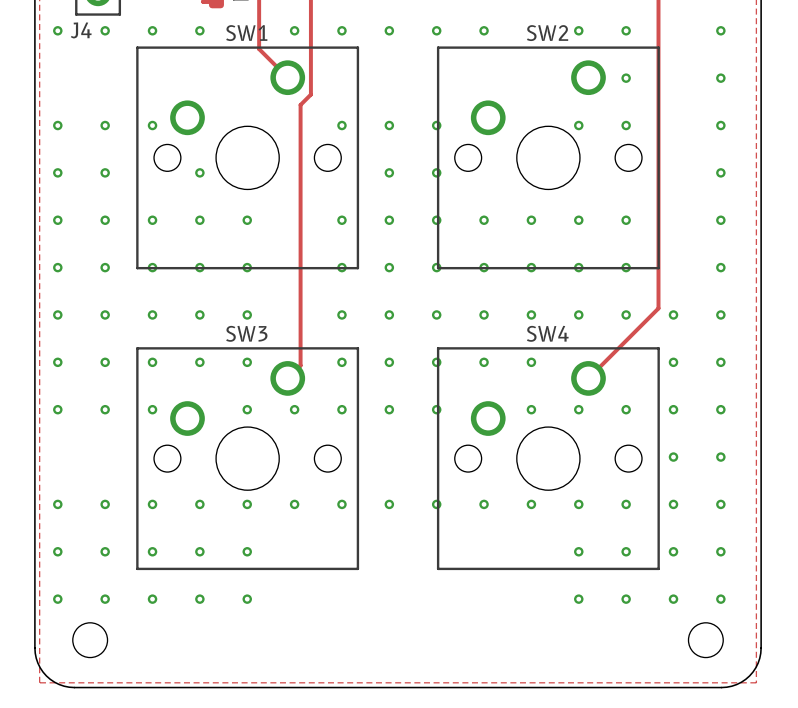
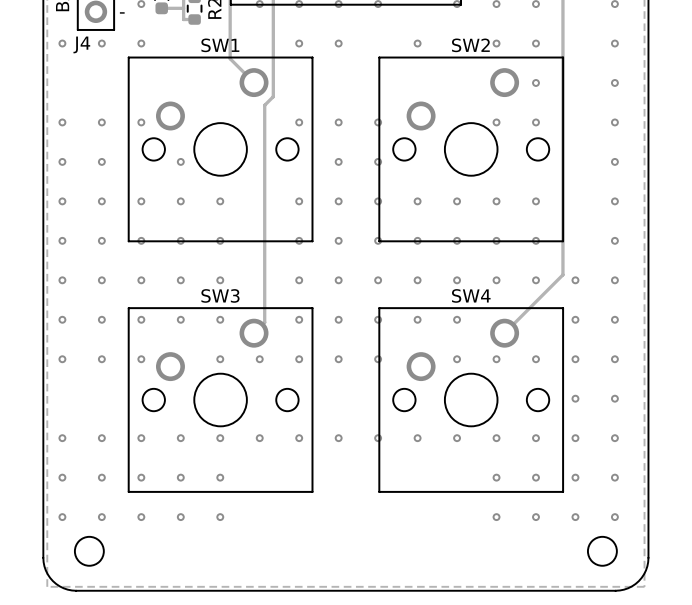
via: (199, 30) -> none
via: (294, 30) -> none
via: (436, 30) -> none

